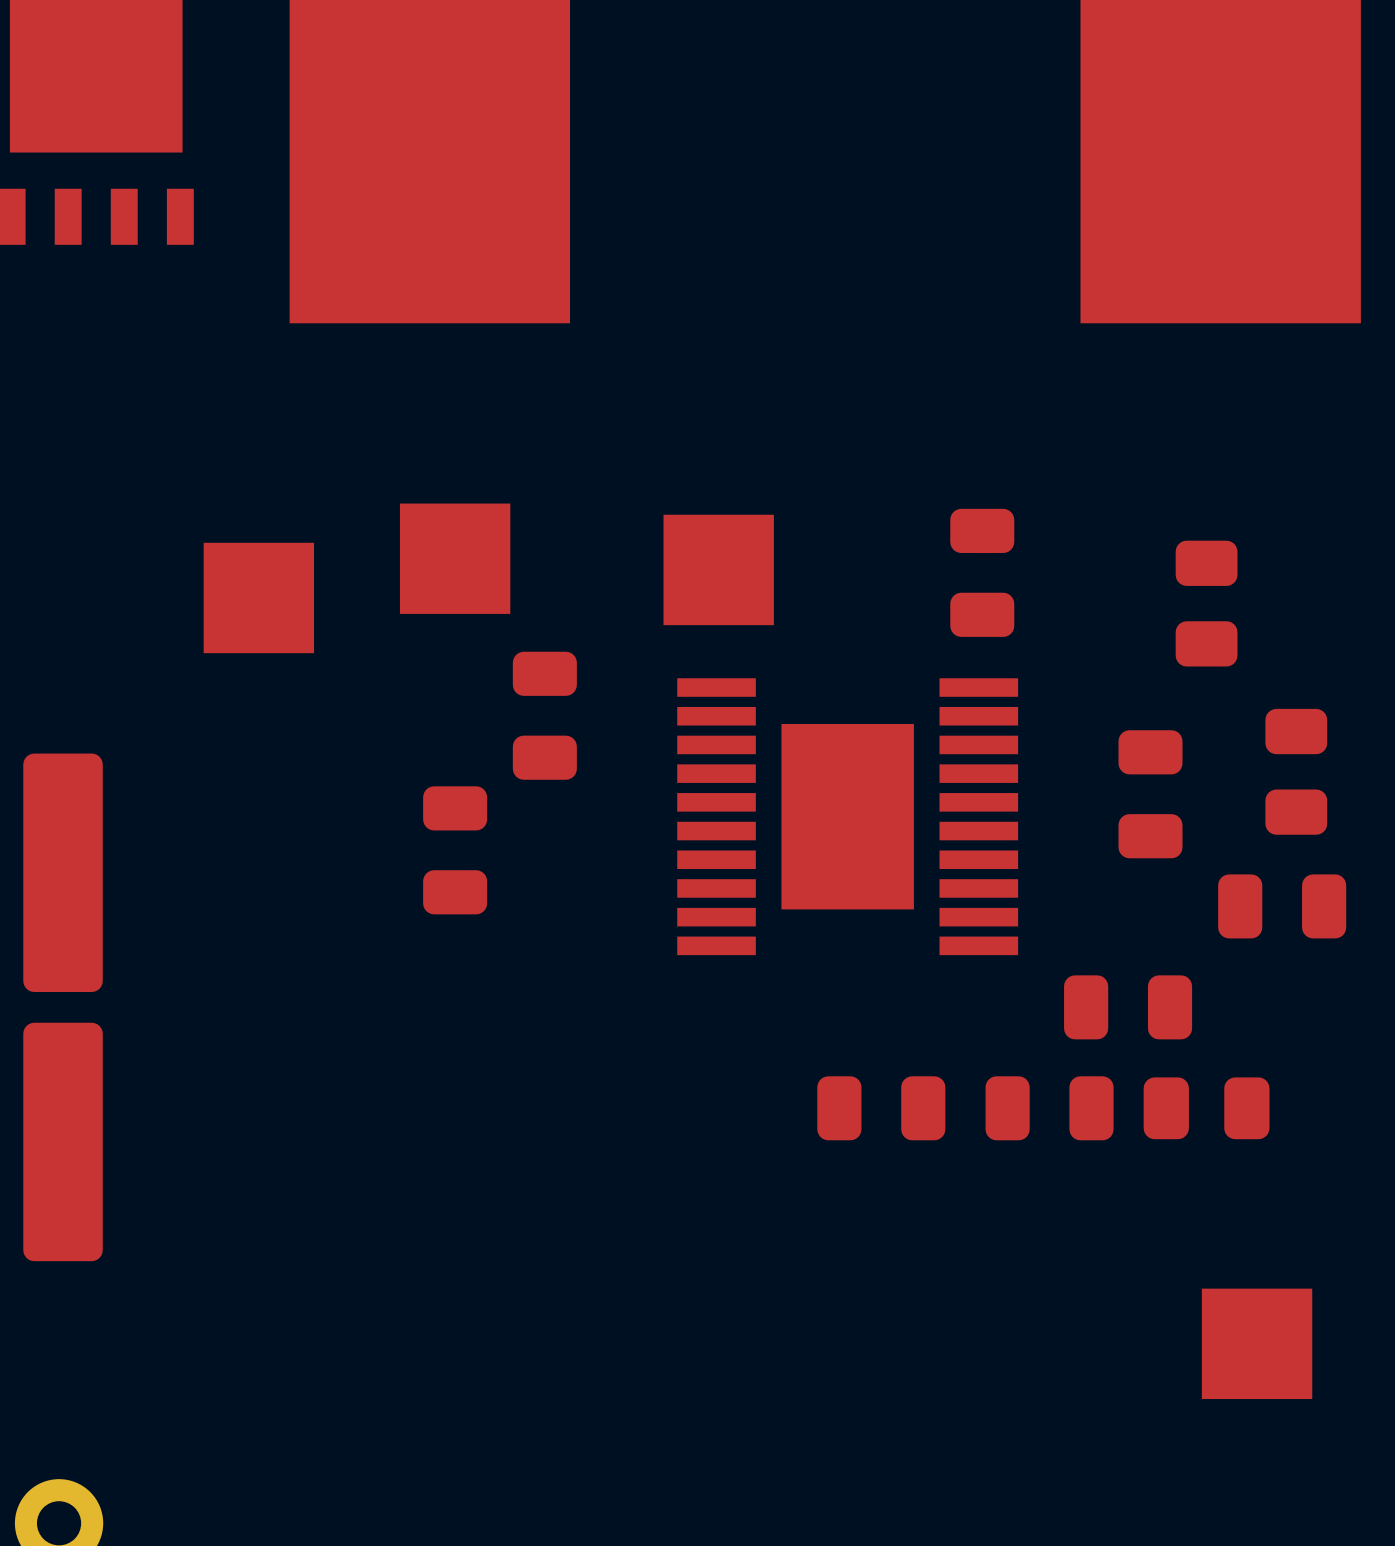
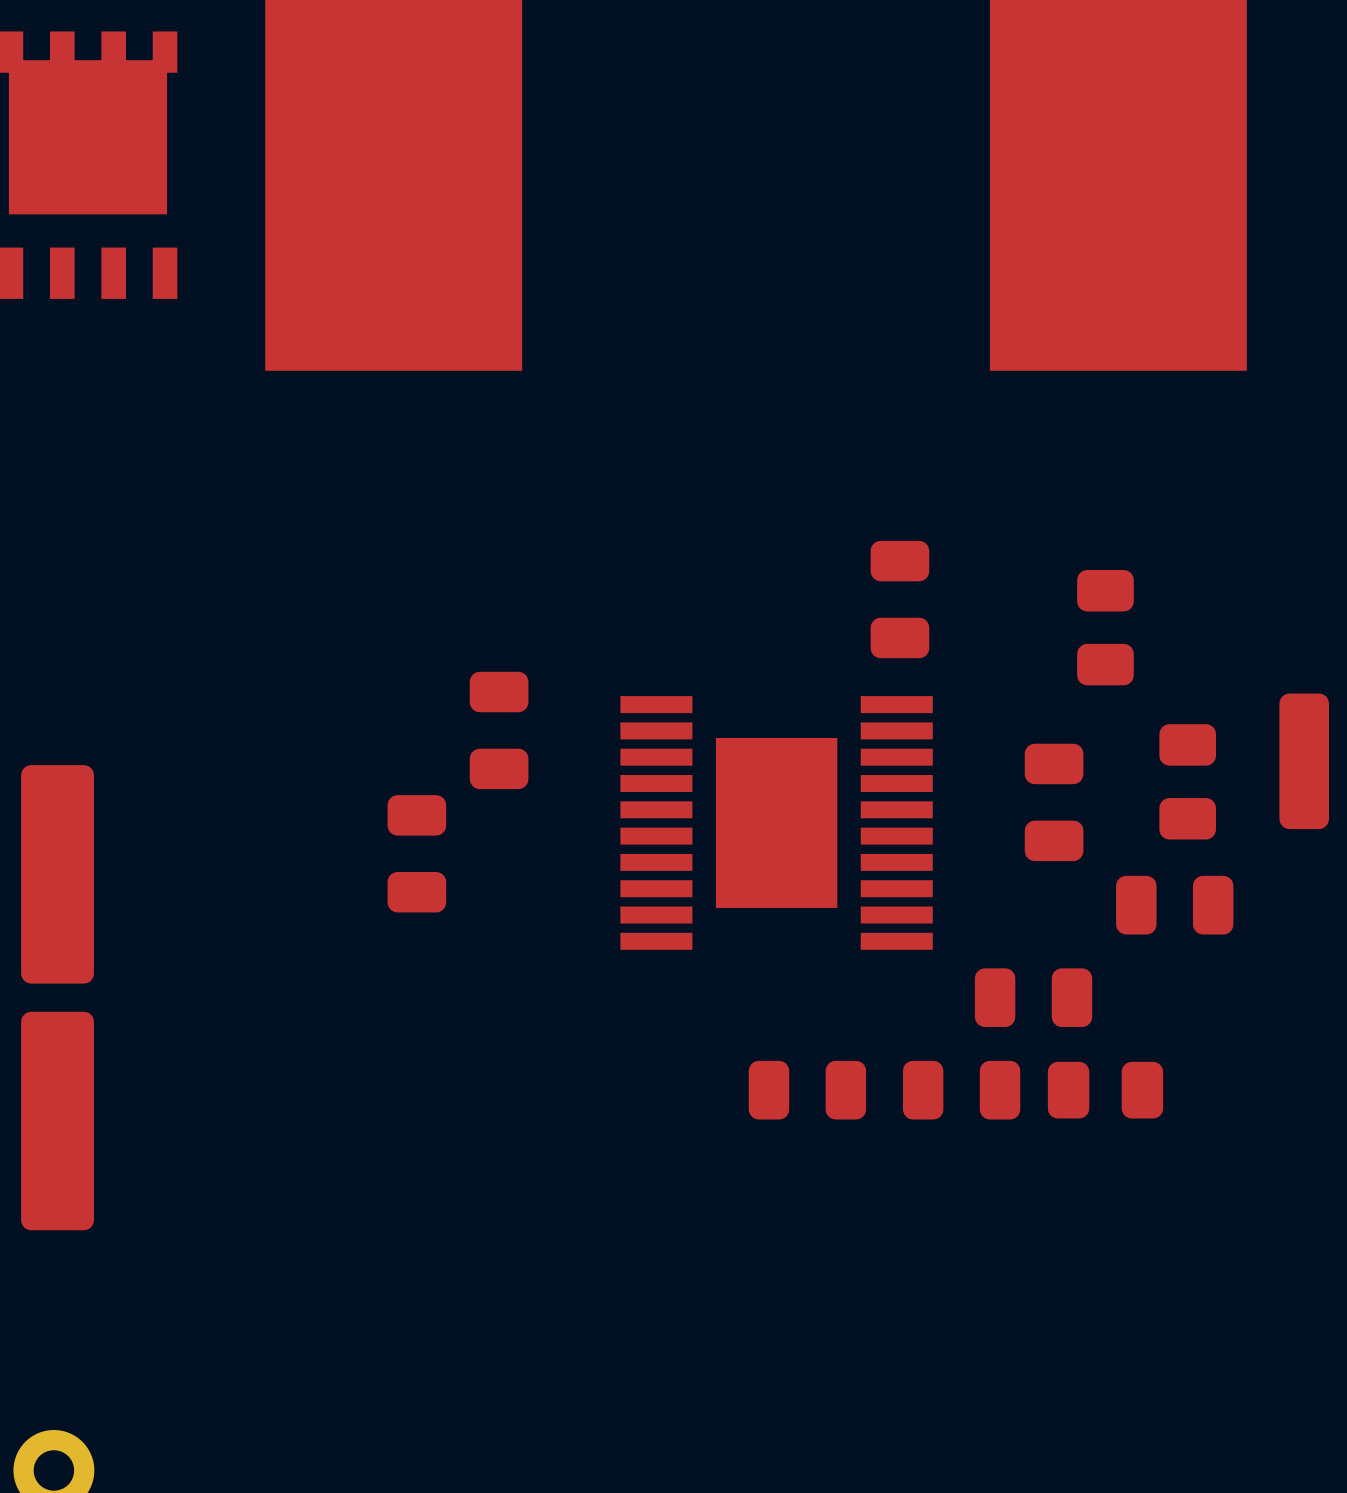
part: (455, 558) -> none
part: (718, 569) -> none
part: (258, 597) -> none
part: (1257, 1343) -> none

